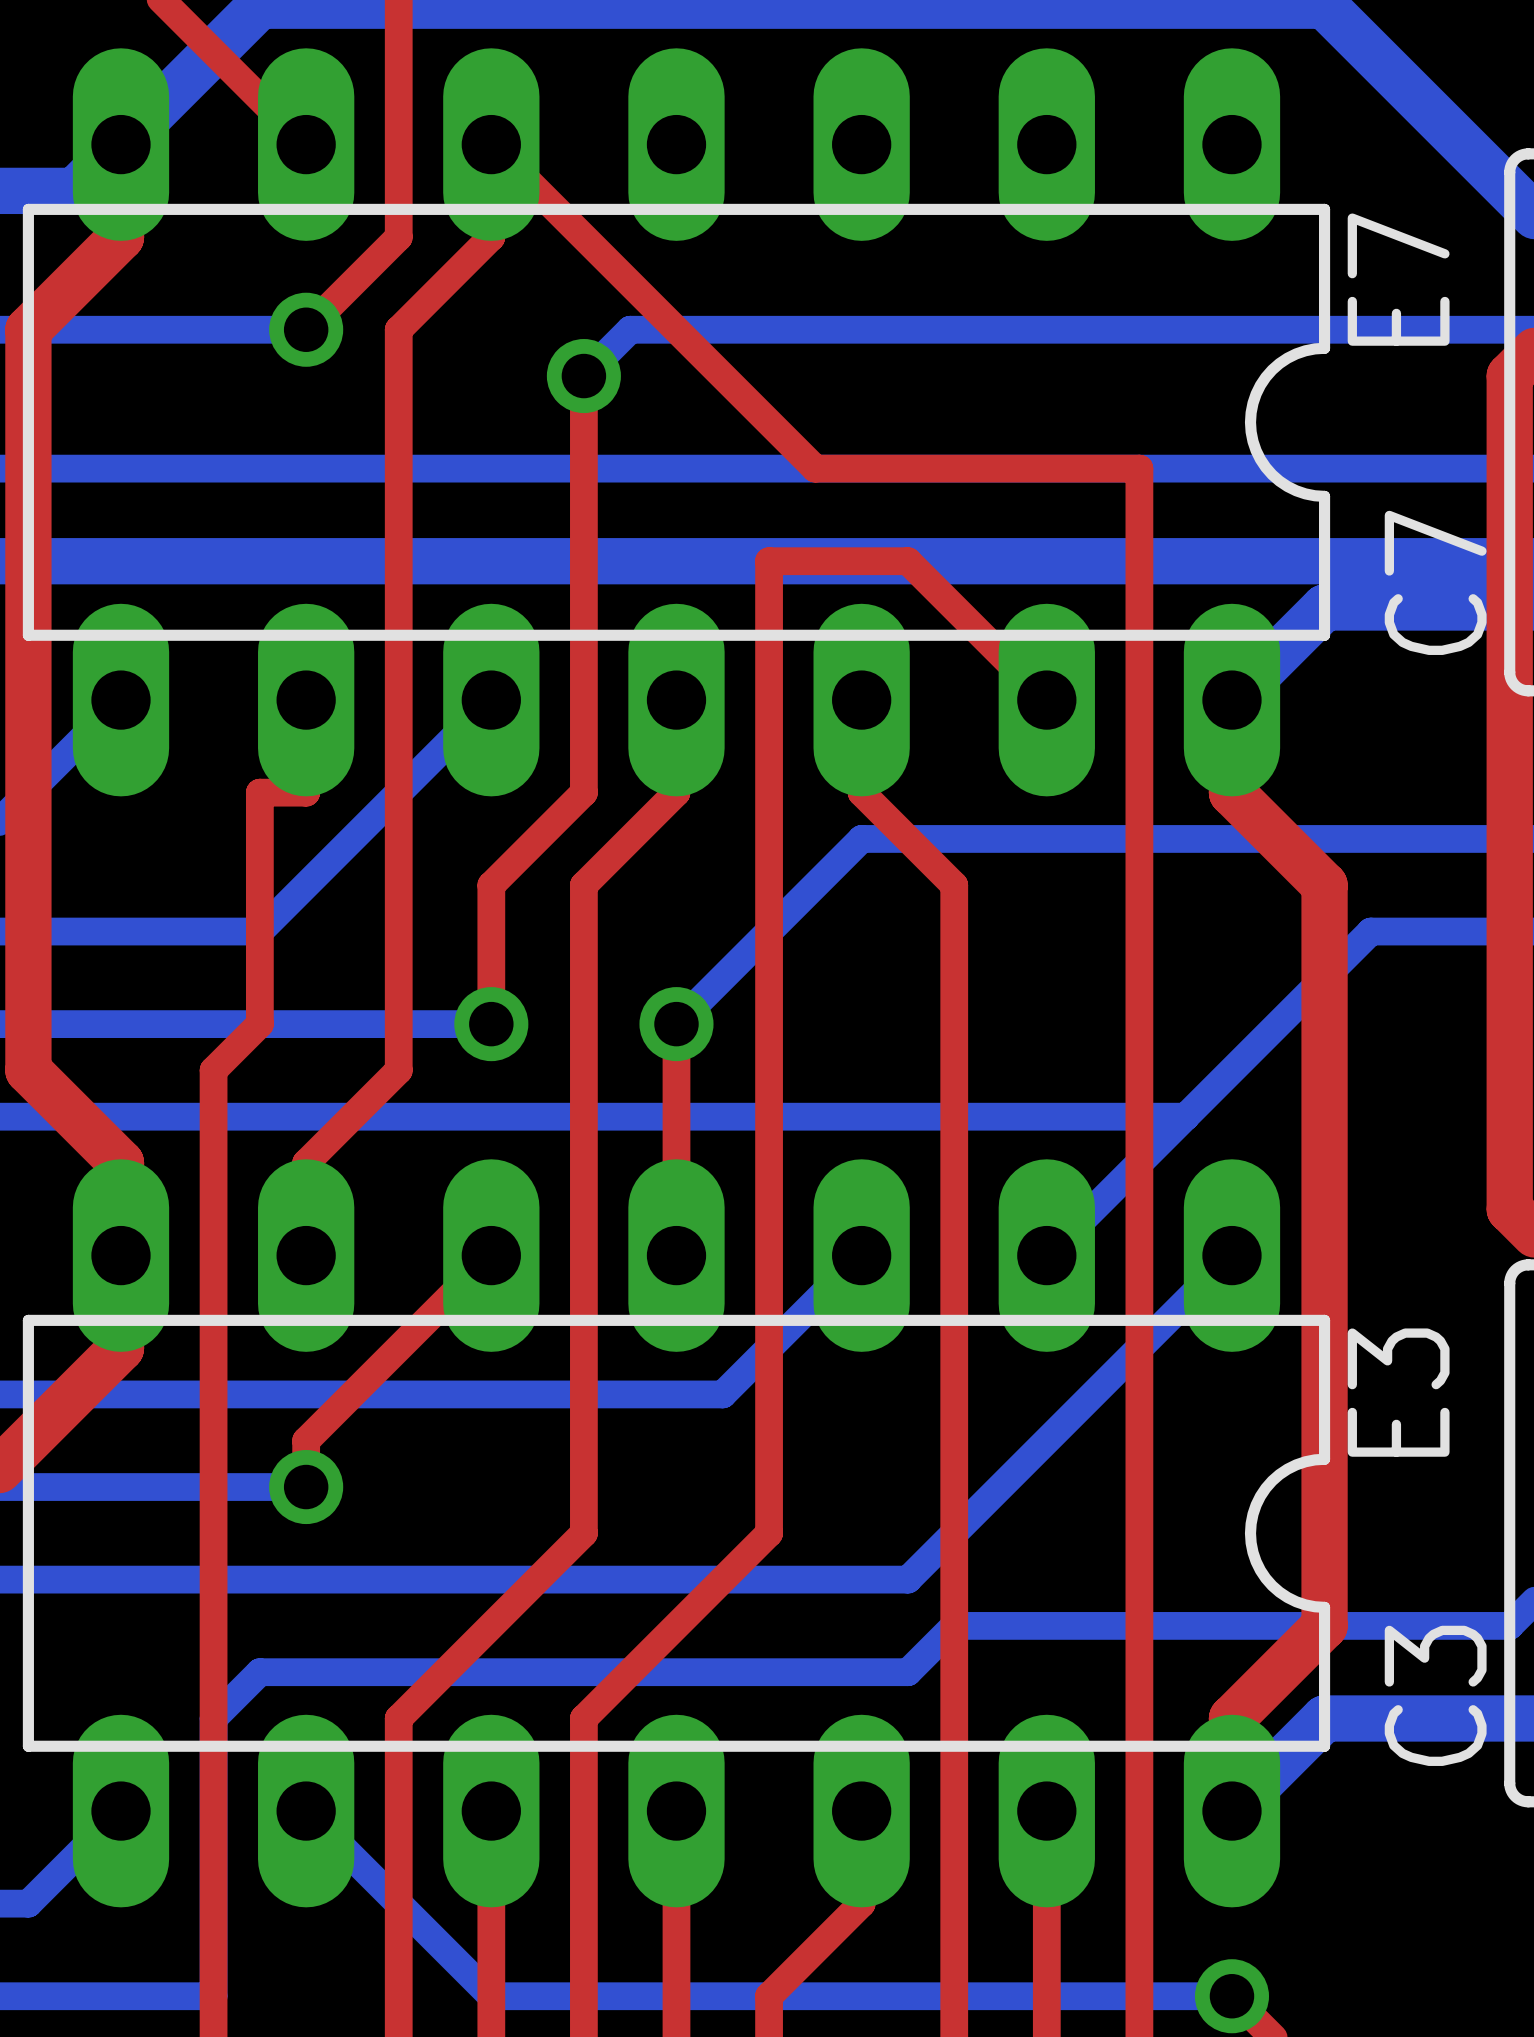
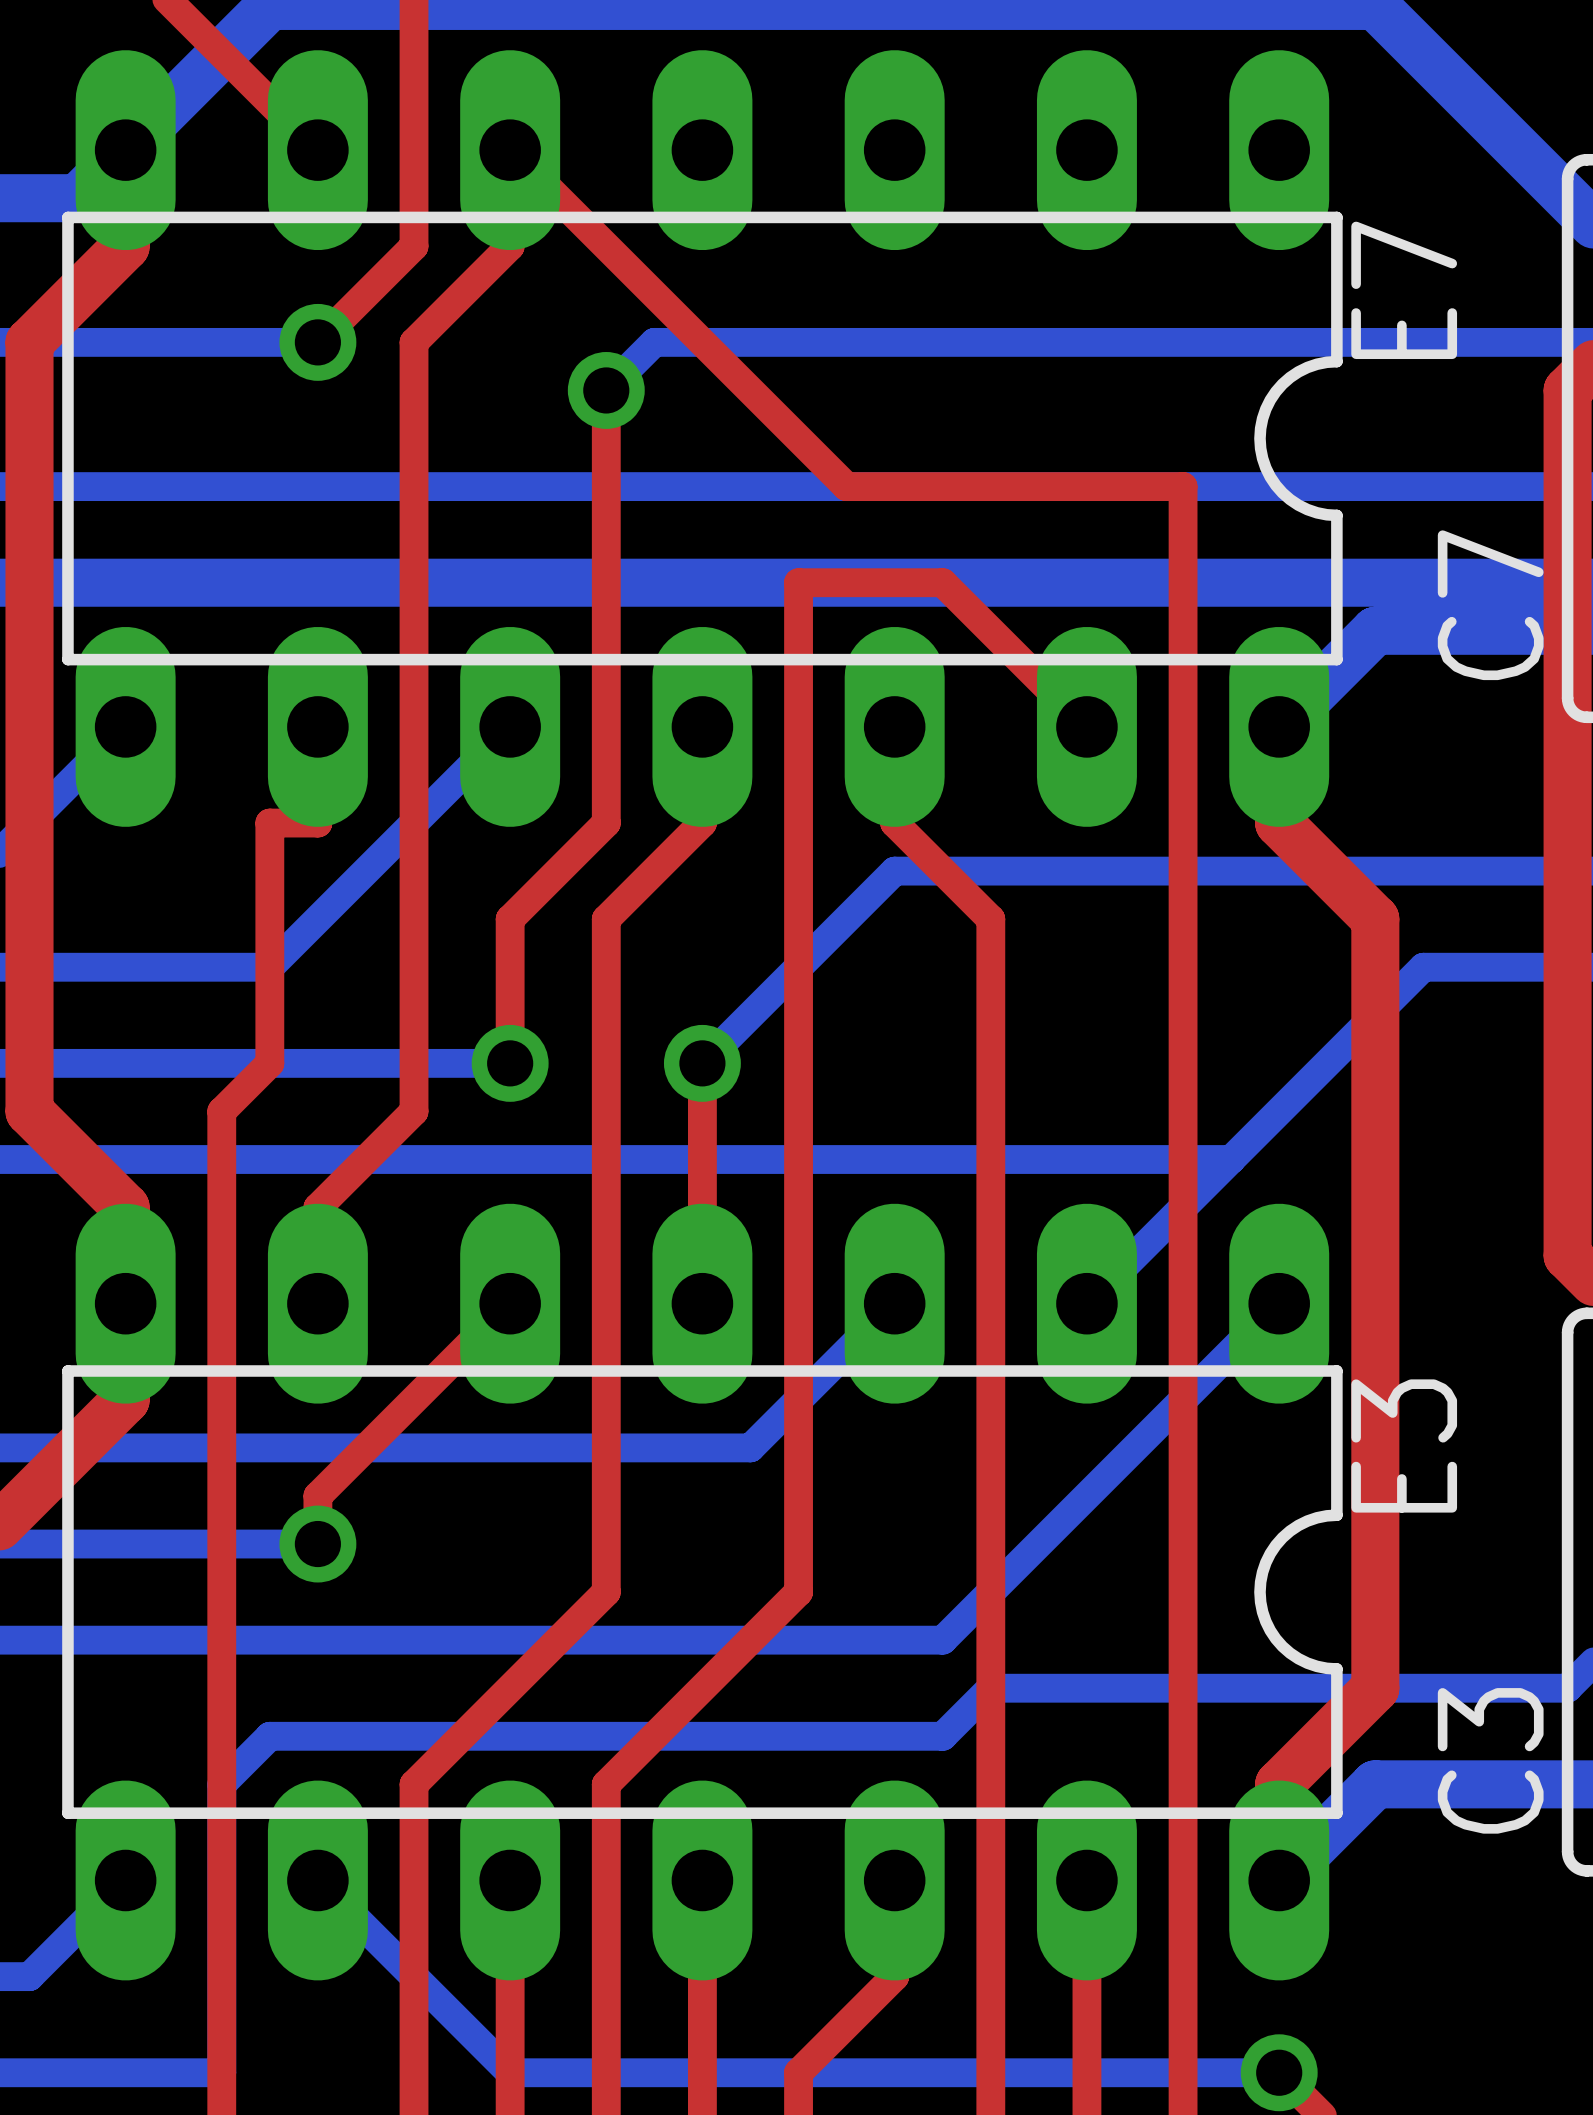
E7 footprint: [22, 48, 1331, 797] -> [62, 50, 1343, 827]
E7 name position: E7 (1398, 279) -> E7 (1404, 290)
E3 footprint: [22, 1159, 1331, 1908] -> [62, 1203, 1343, 1981]
E3 name position: E3 (1398, 1392) -> E3 (1404, 1445)

